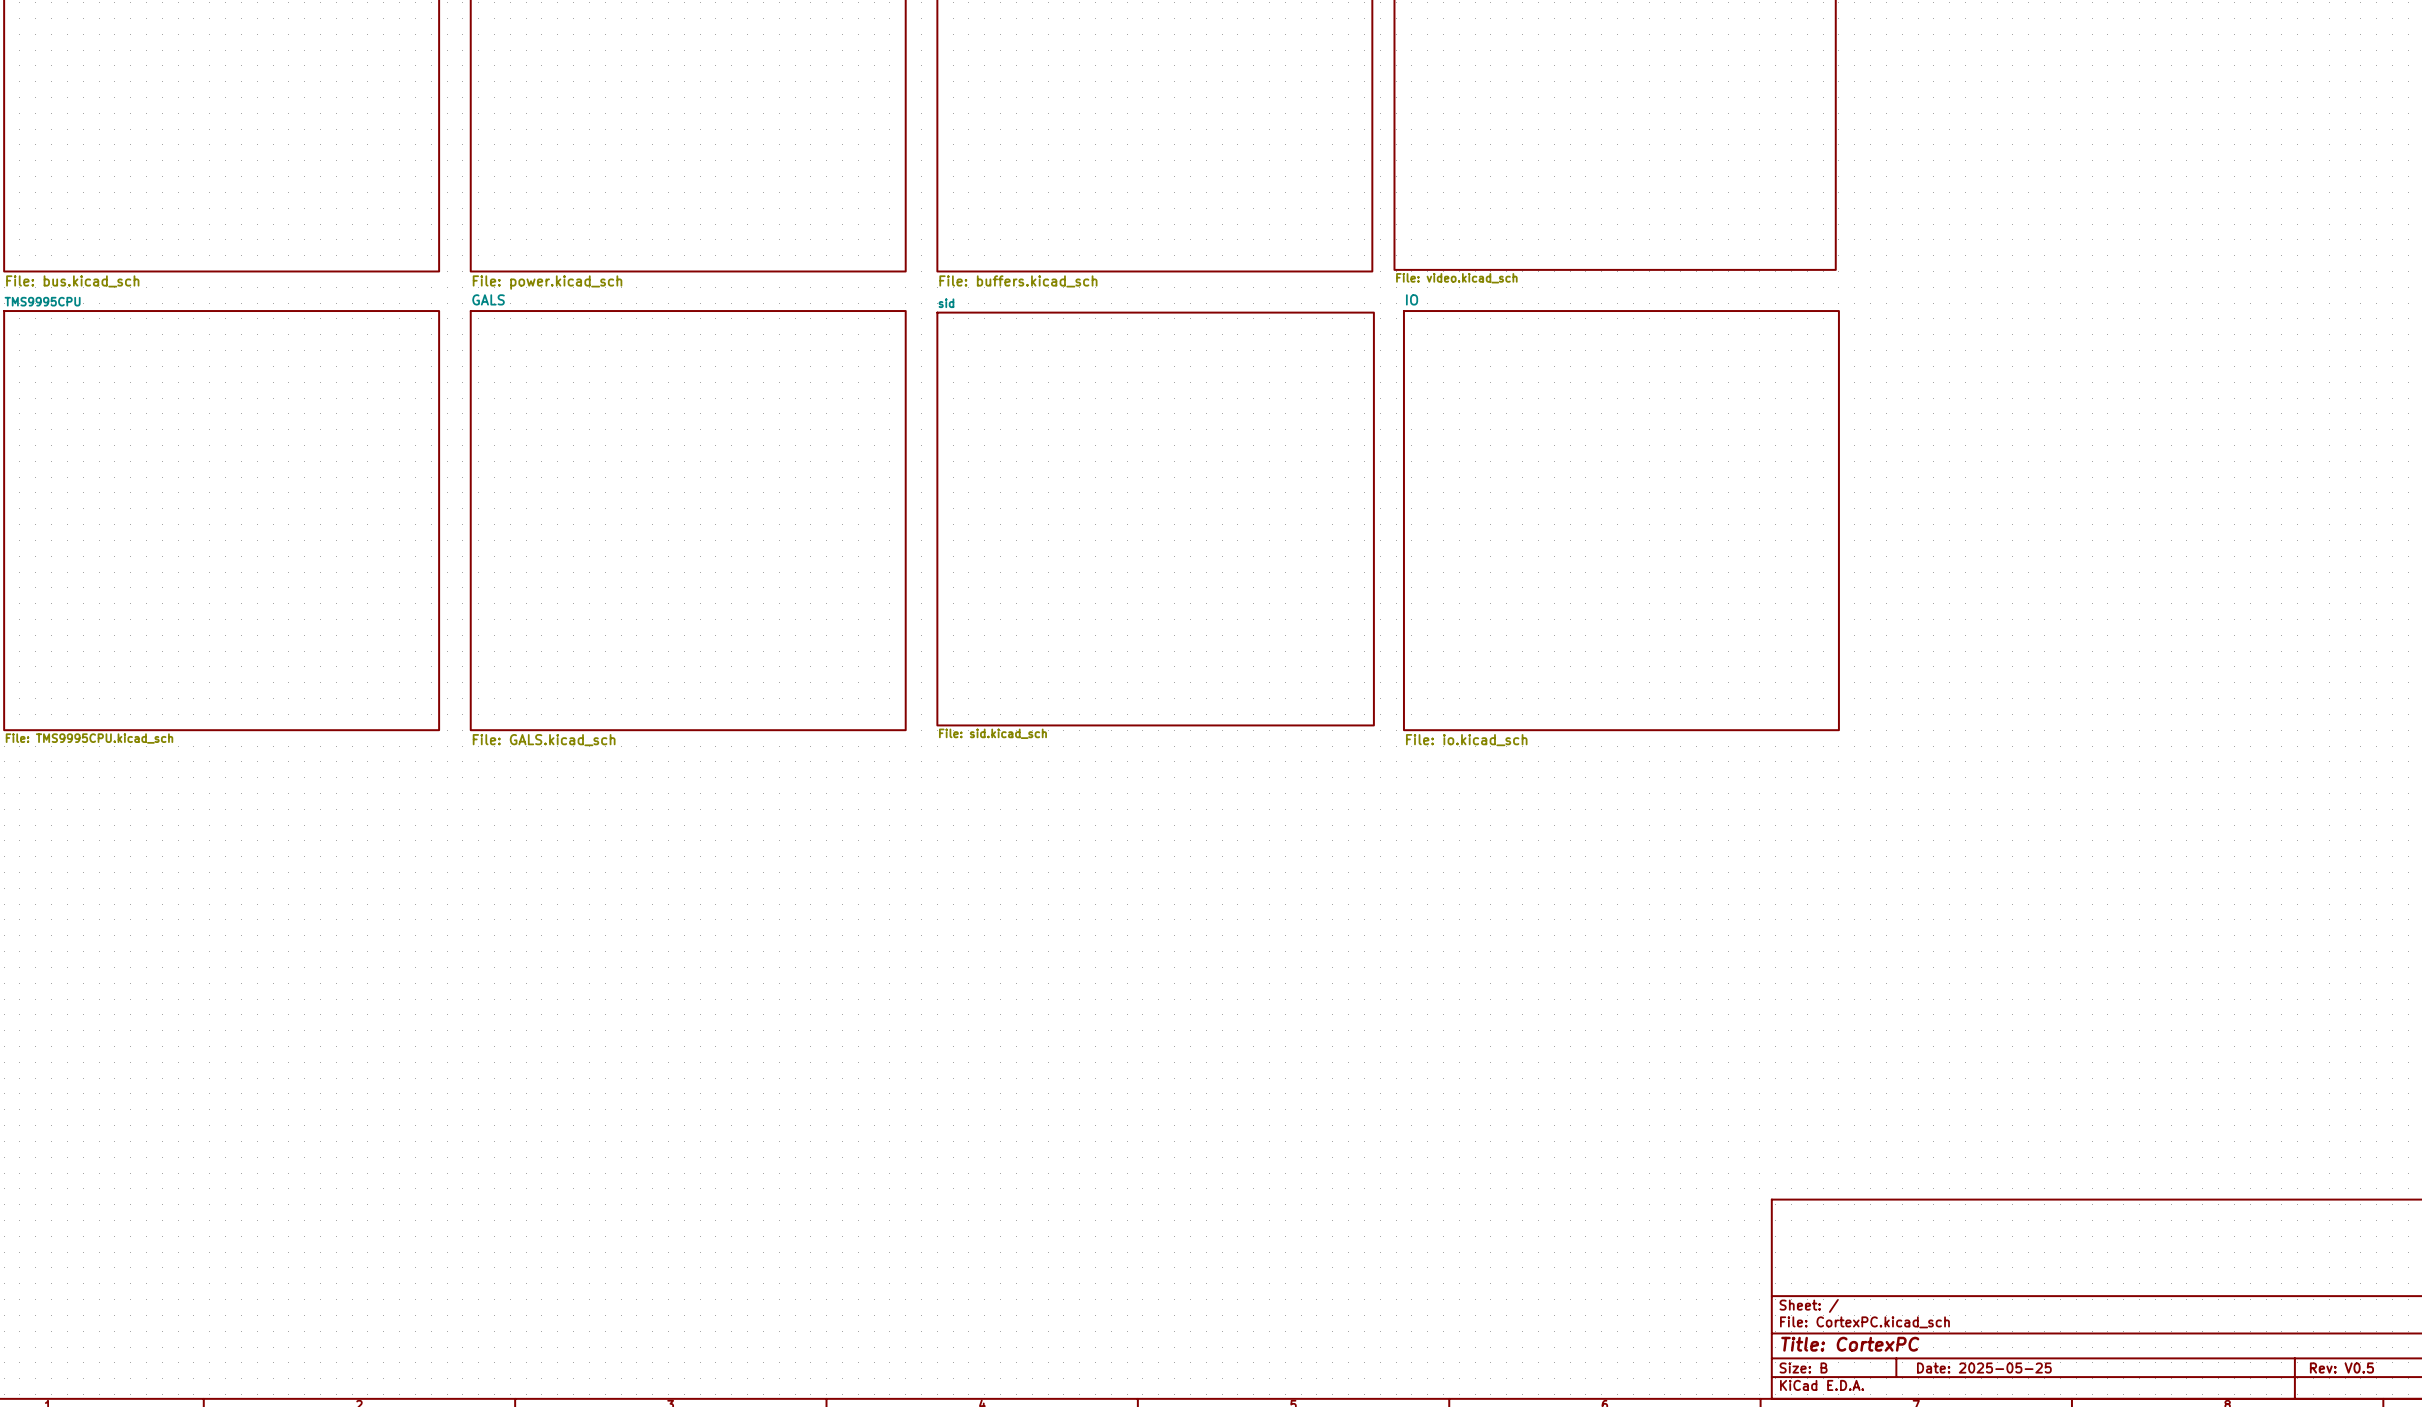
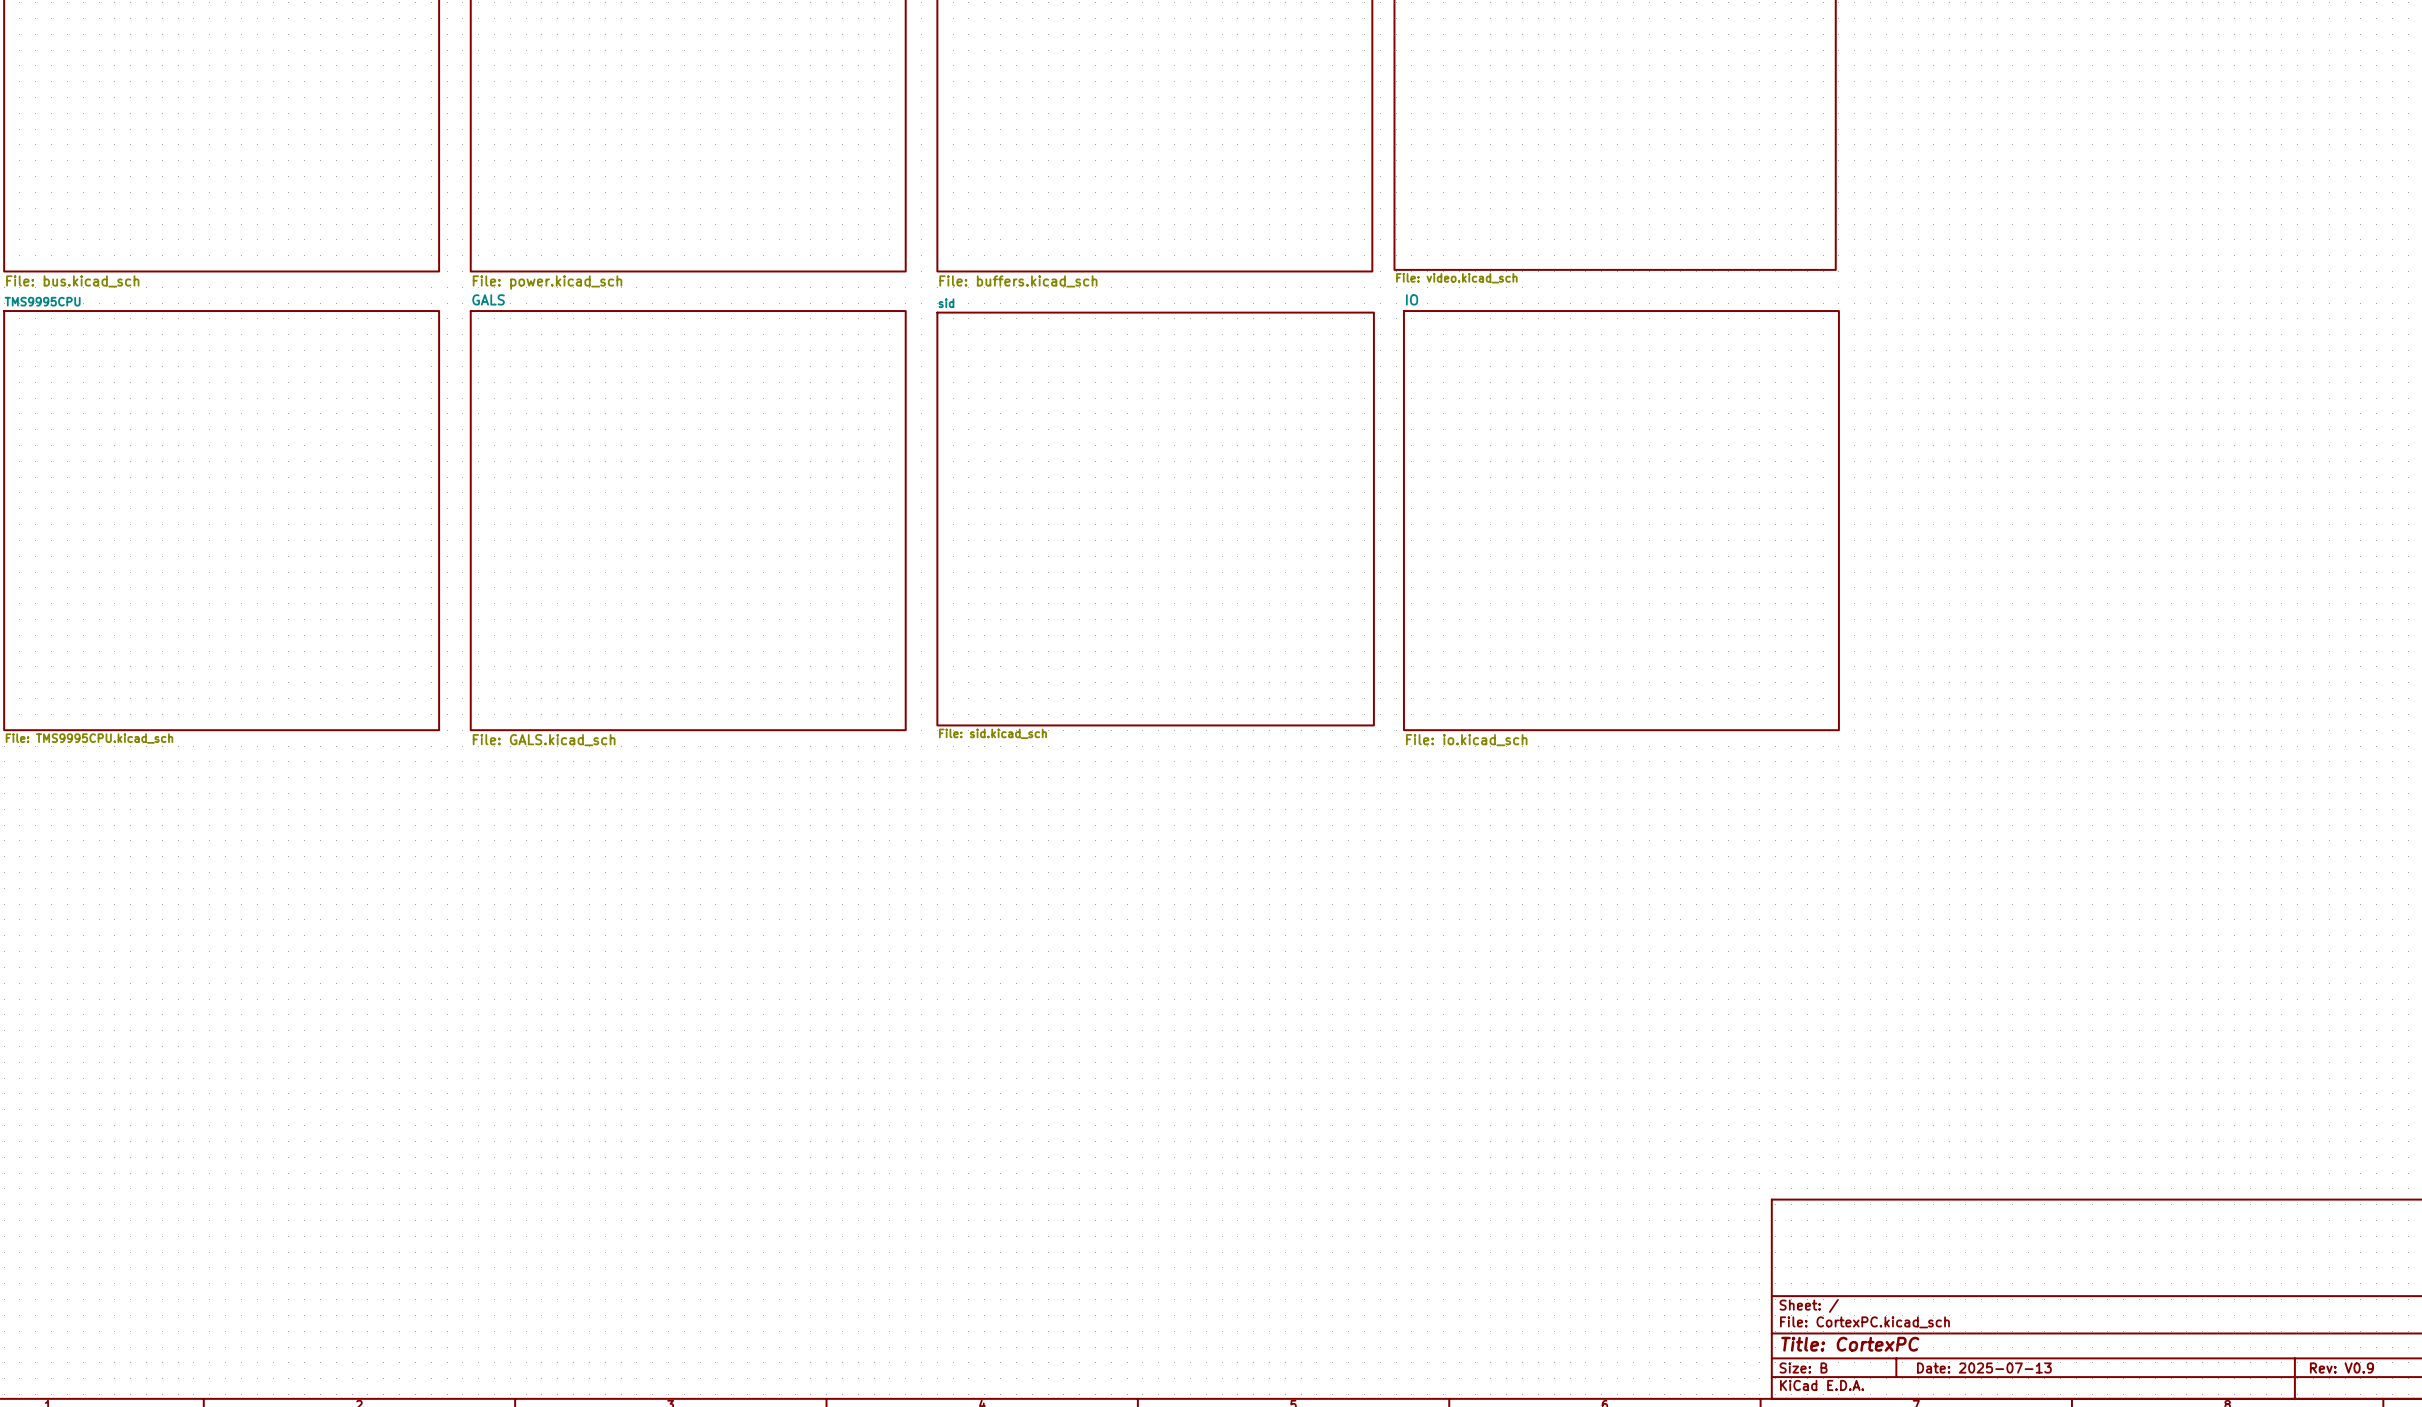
title block: Date: 2025-05-25 (1984, 1368) -> Date: 2025-07-13 (1984, 1368)
title block: Rev: V0.5 (2341, 1368) -> Rev: V0.9 (2341, 1368)

